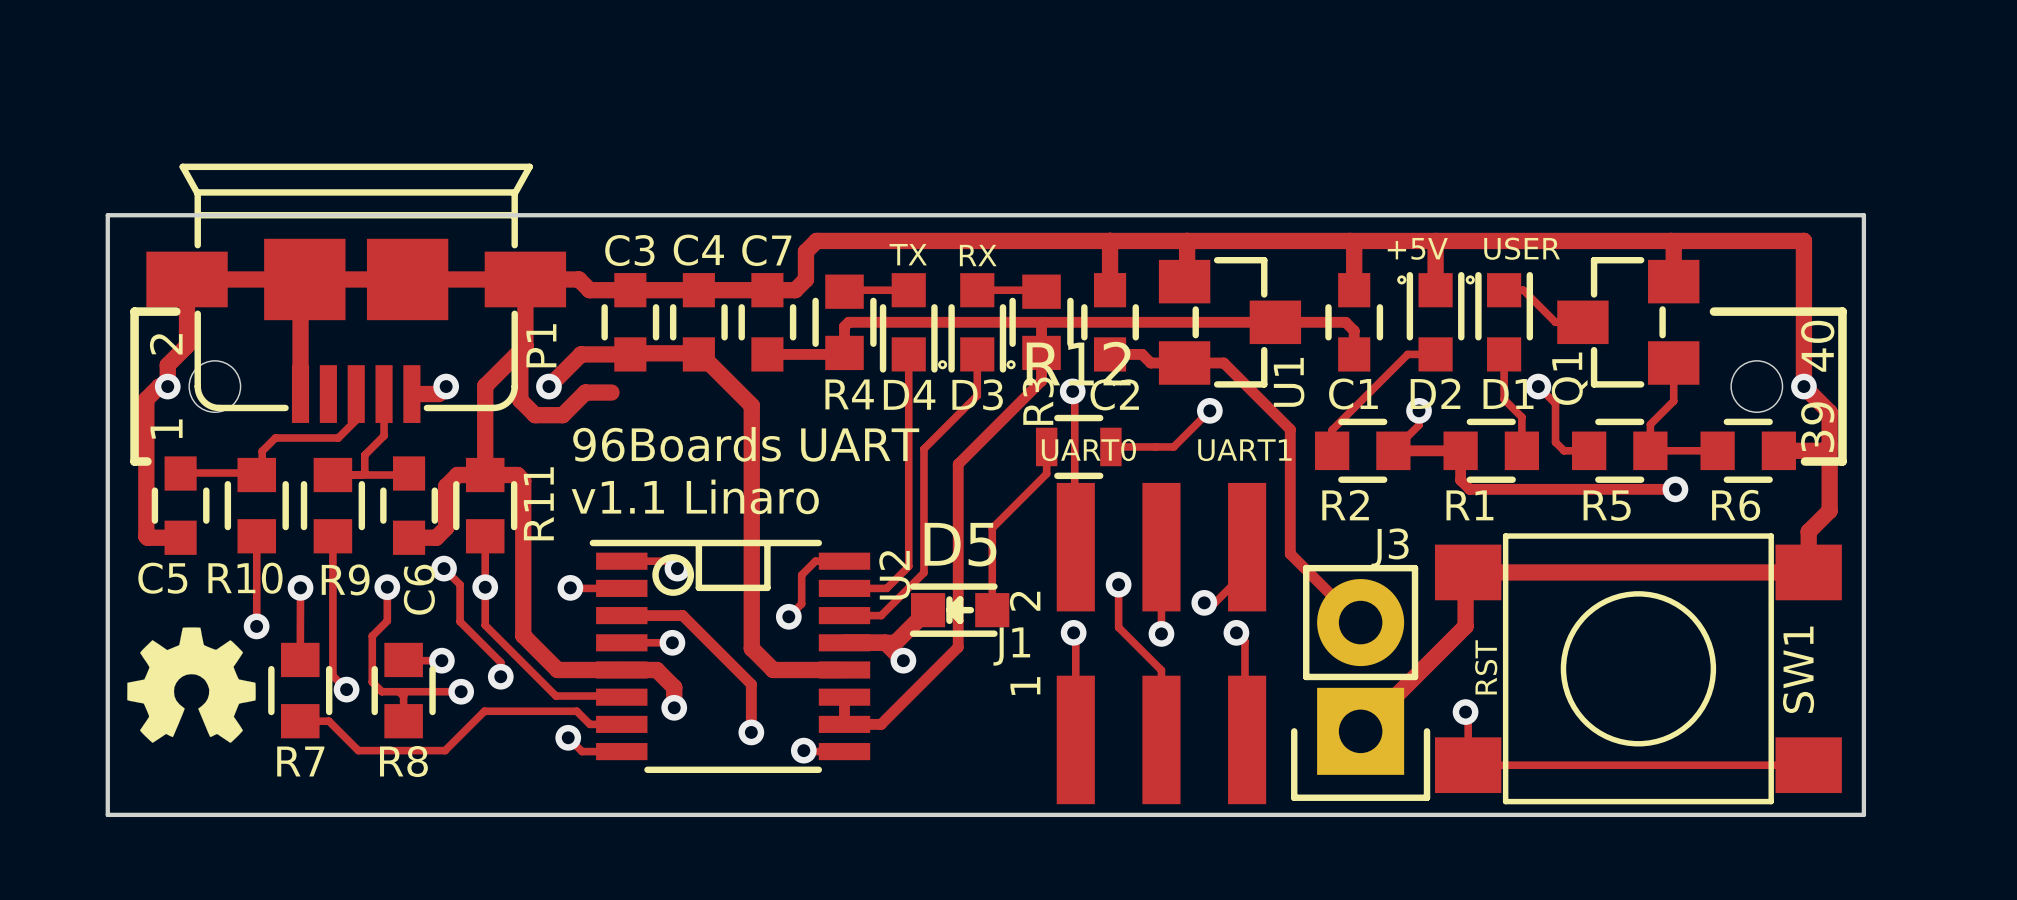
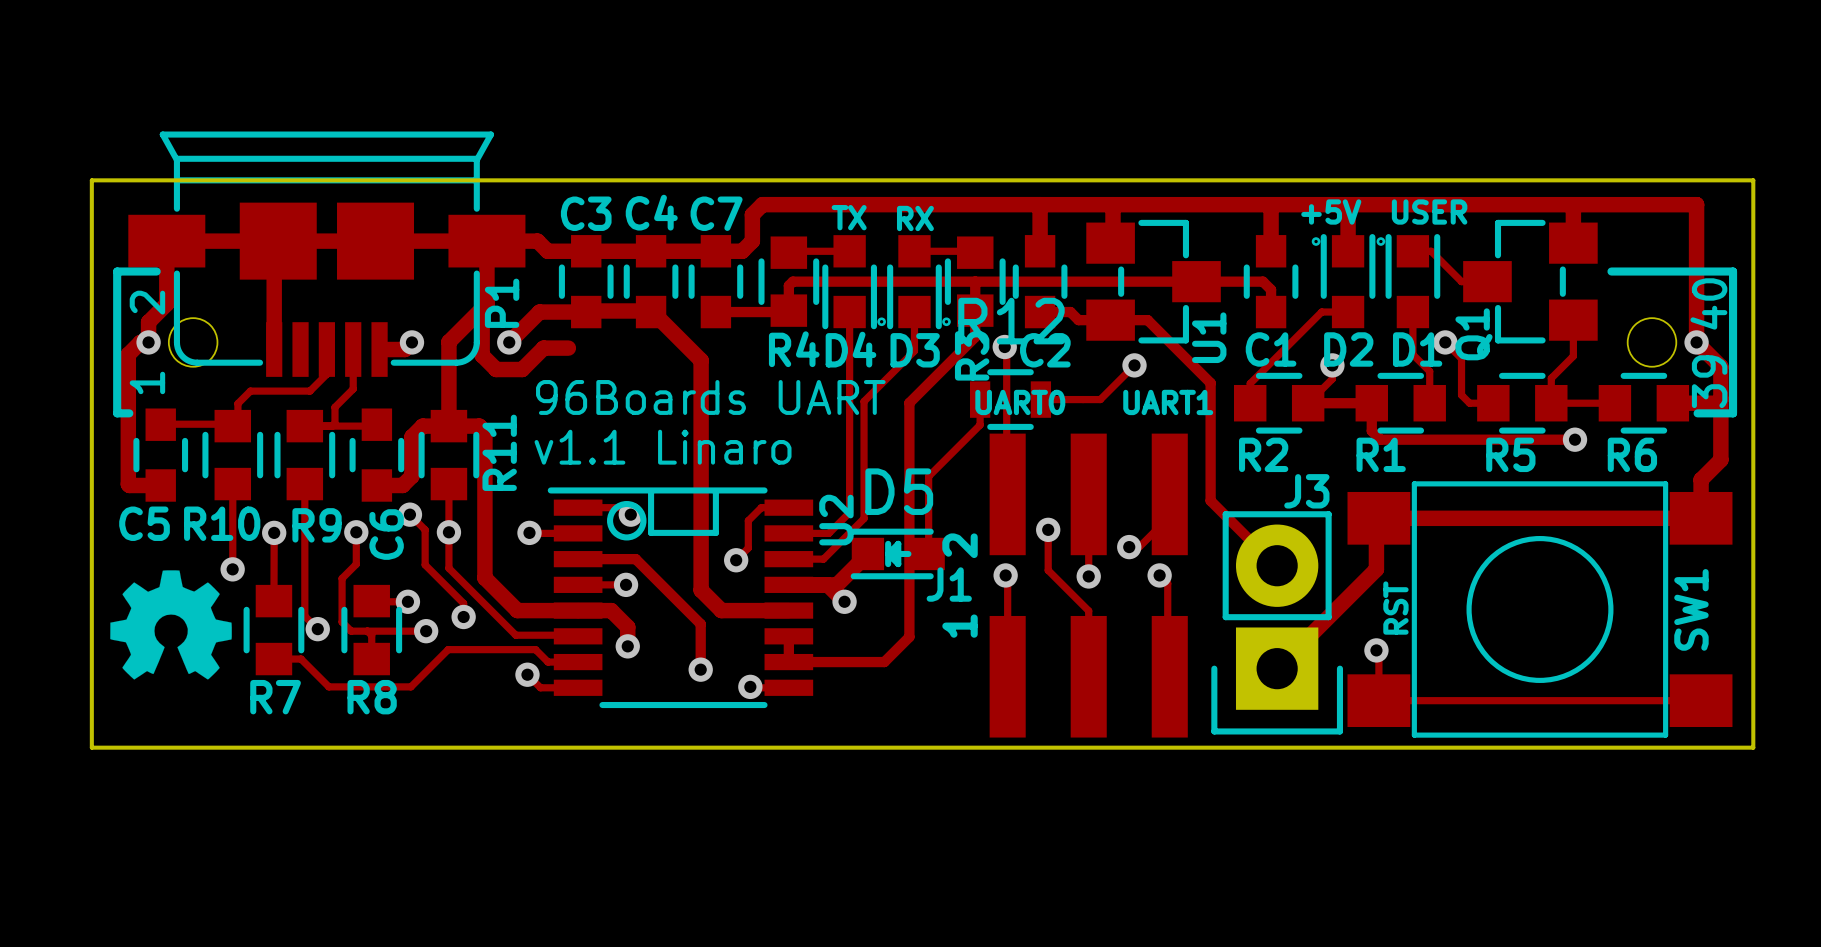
track: (971, 450) (958, 464) (958, 647) (881, 724) -> (909, 402) (909, 637) (884, 662) (823, 662)

